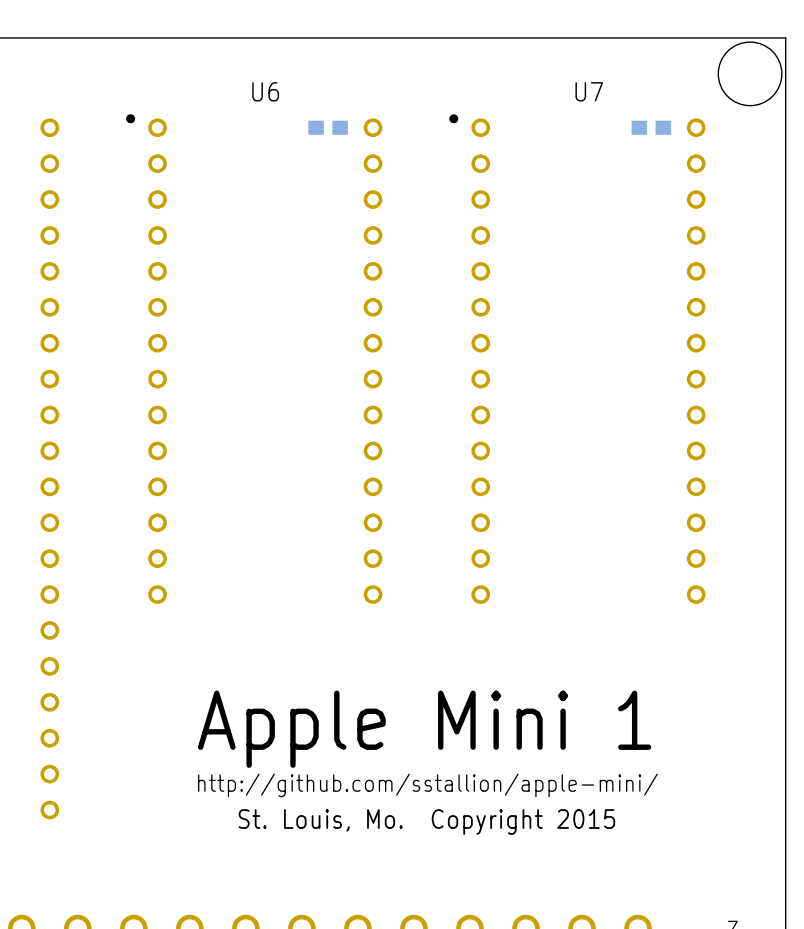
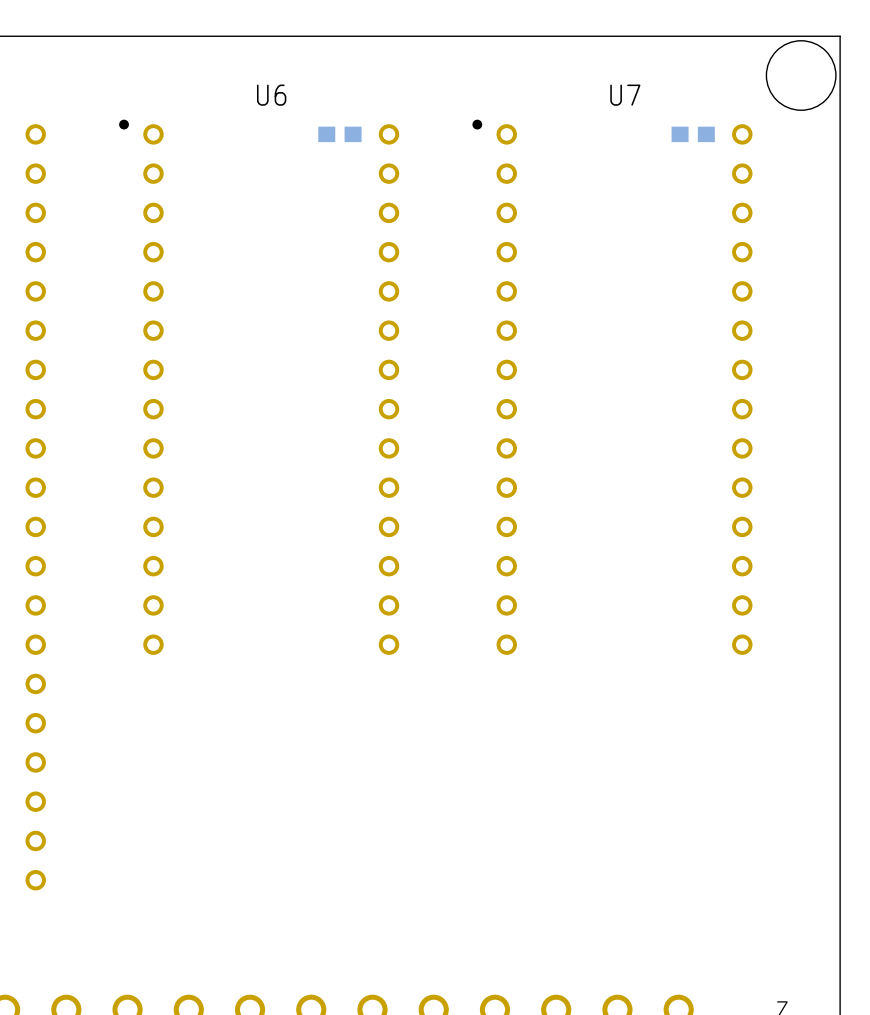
text: Apple Mini 1 (424, 729) -> none
text: http://github.com/sstallion/apple-mini/ (427, 785) -> none
text: St. Louis, Mo. Copyright 2015 (426, 822) -> none

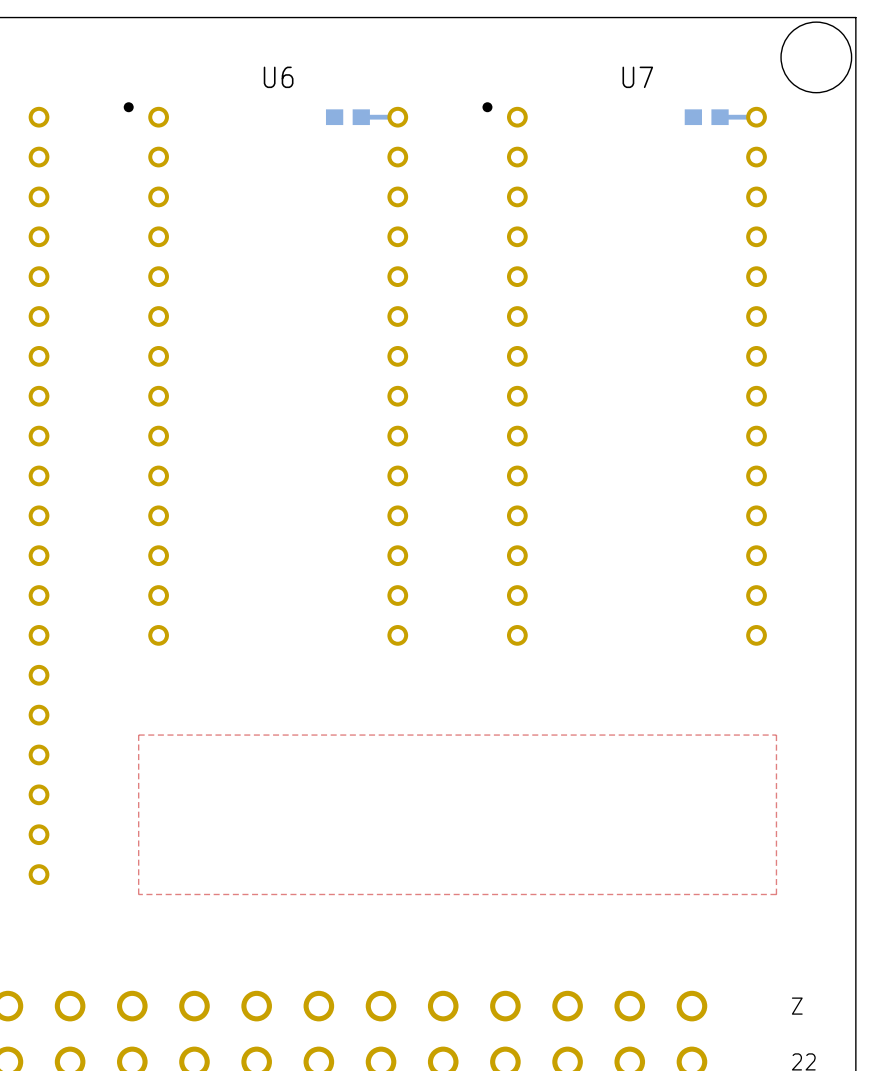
bottom track: none -> (361, 117) (397, 117)
bottom track: none -> (720, 117) (756, 117)
top zone outline: none -> (138, 735) (776, 735) (776, 894) (138, 894) (138, 735)

